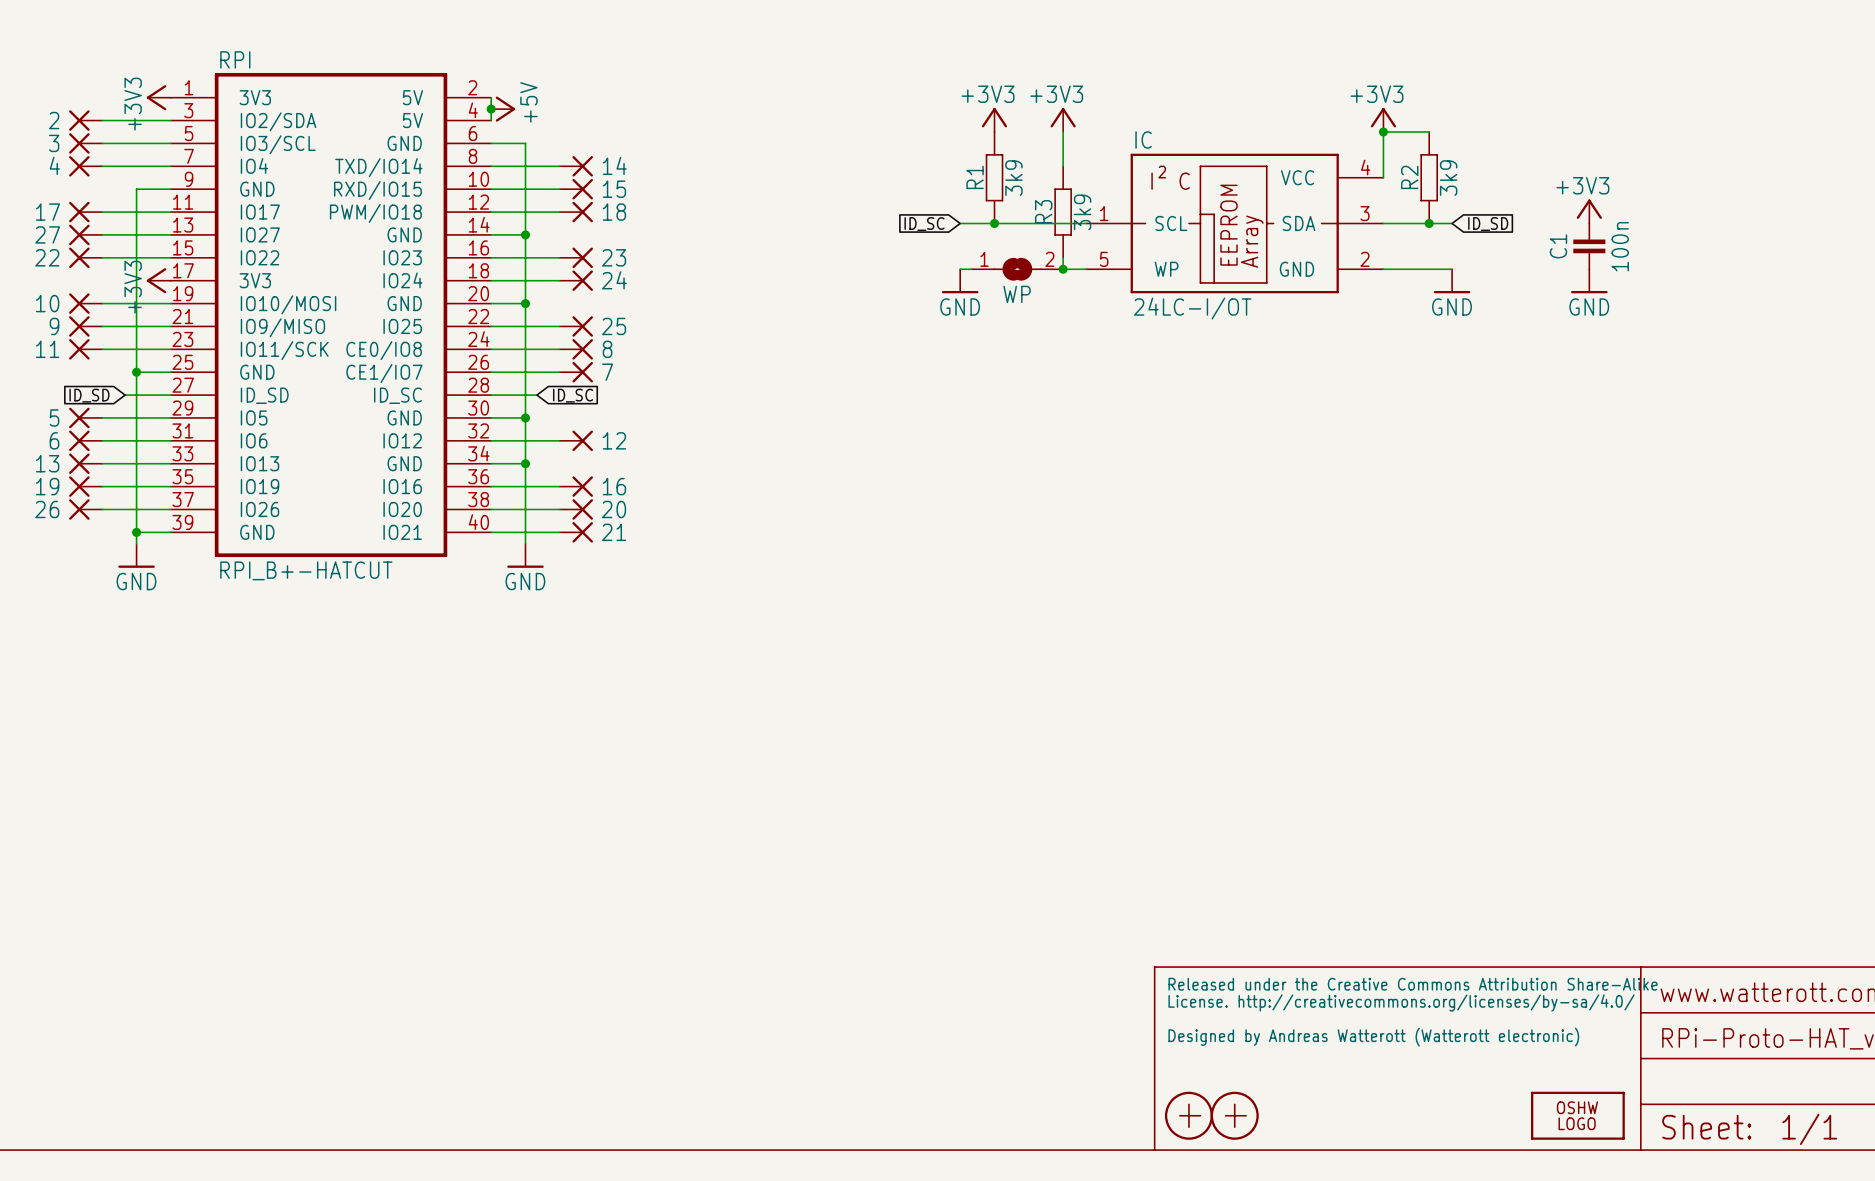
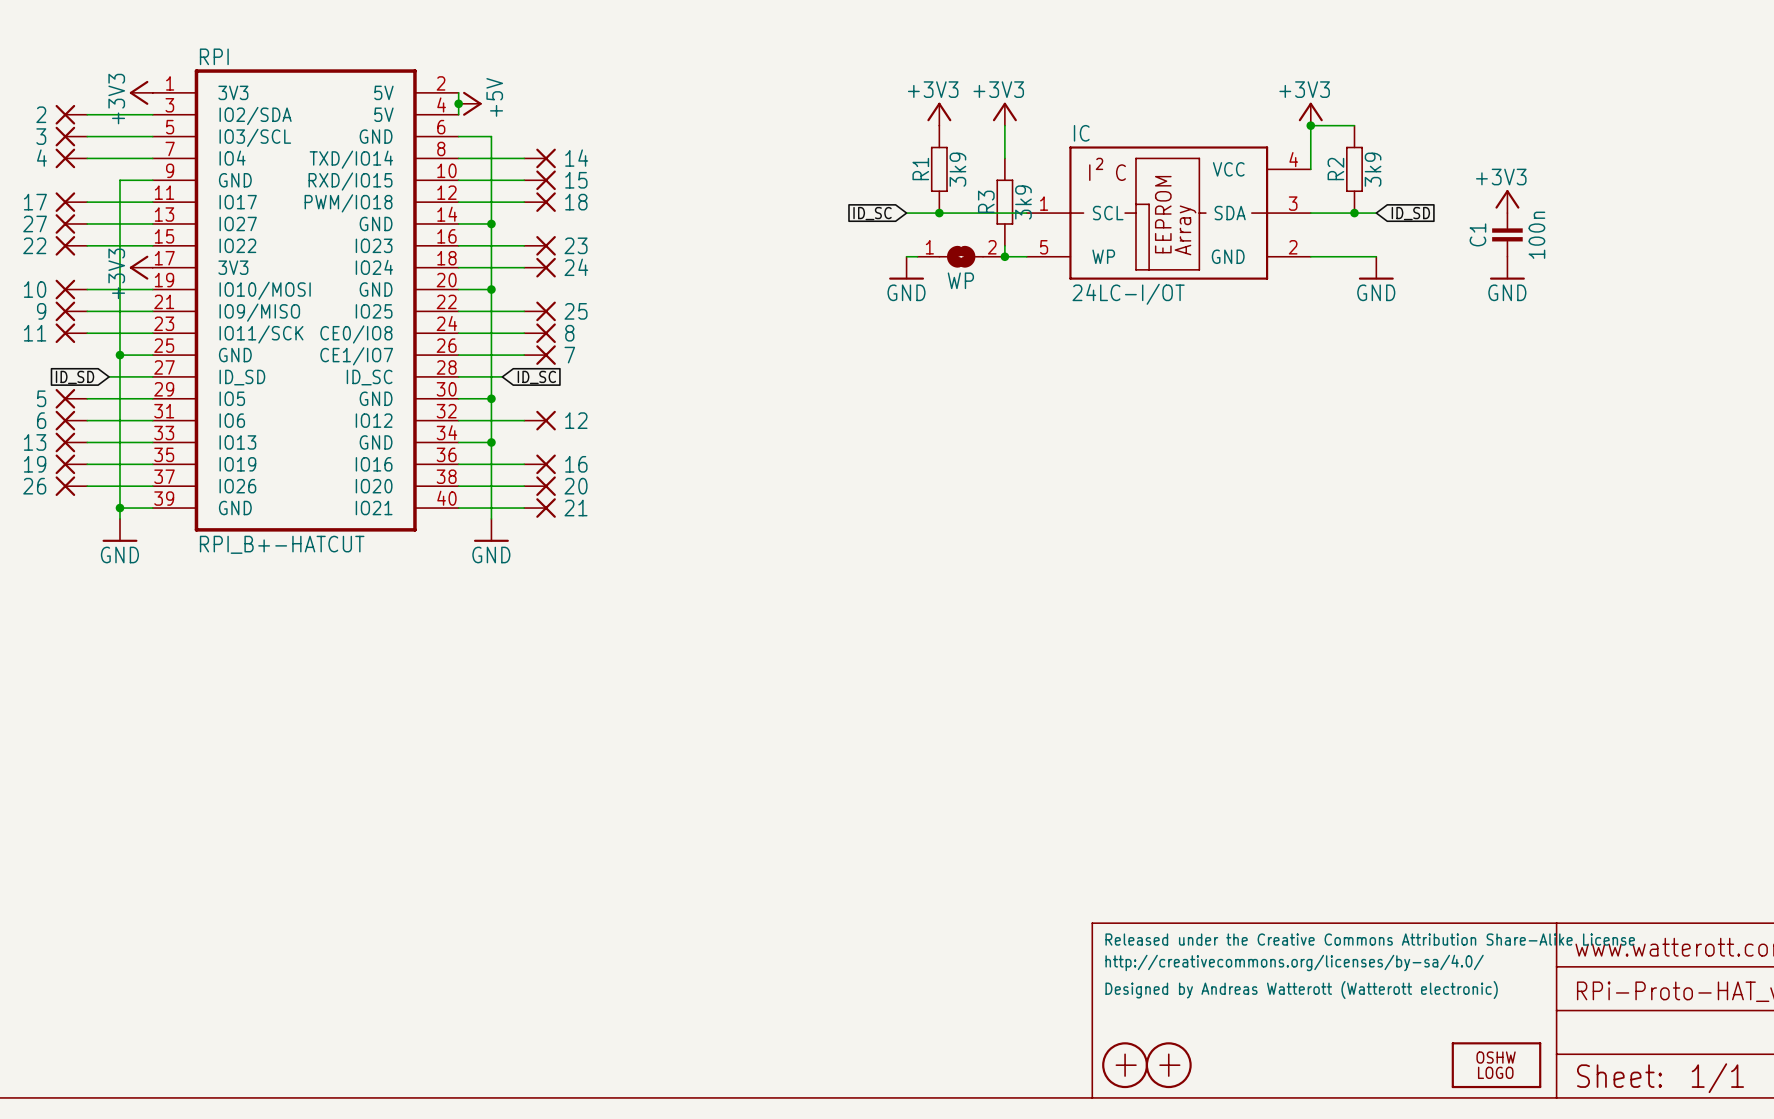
text: License. http://creativecommons.org/licenses/by-sa/4.0/ (1401, 1003) -> Released under the Creative Commons Attribution Share-Alike License (1370, 939)
text: none -> http://creativecommons.org/licenses/by-sa/4.0/ (1294, 962)

